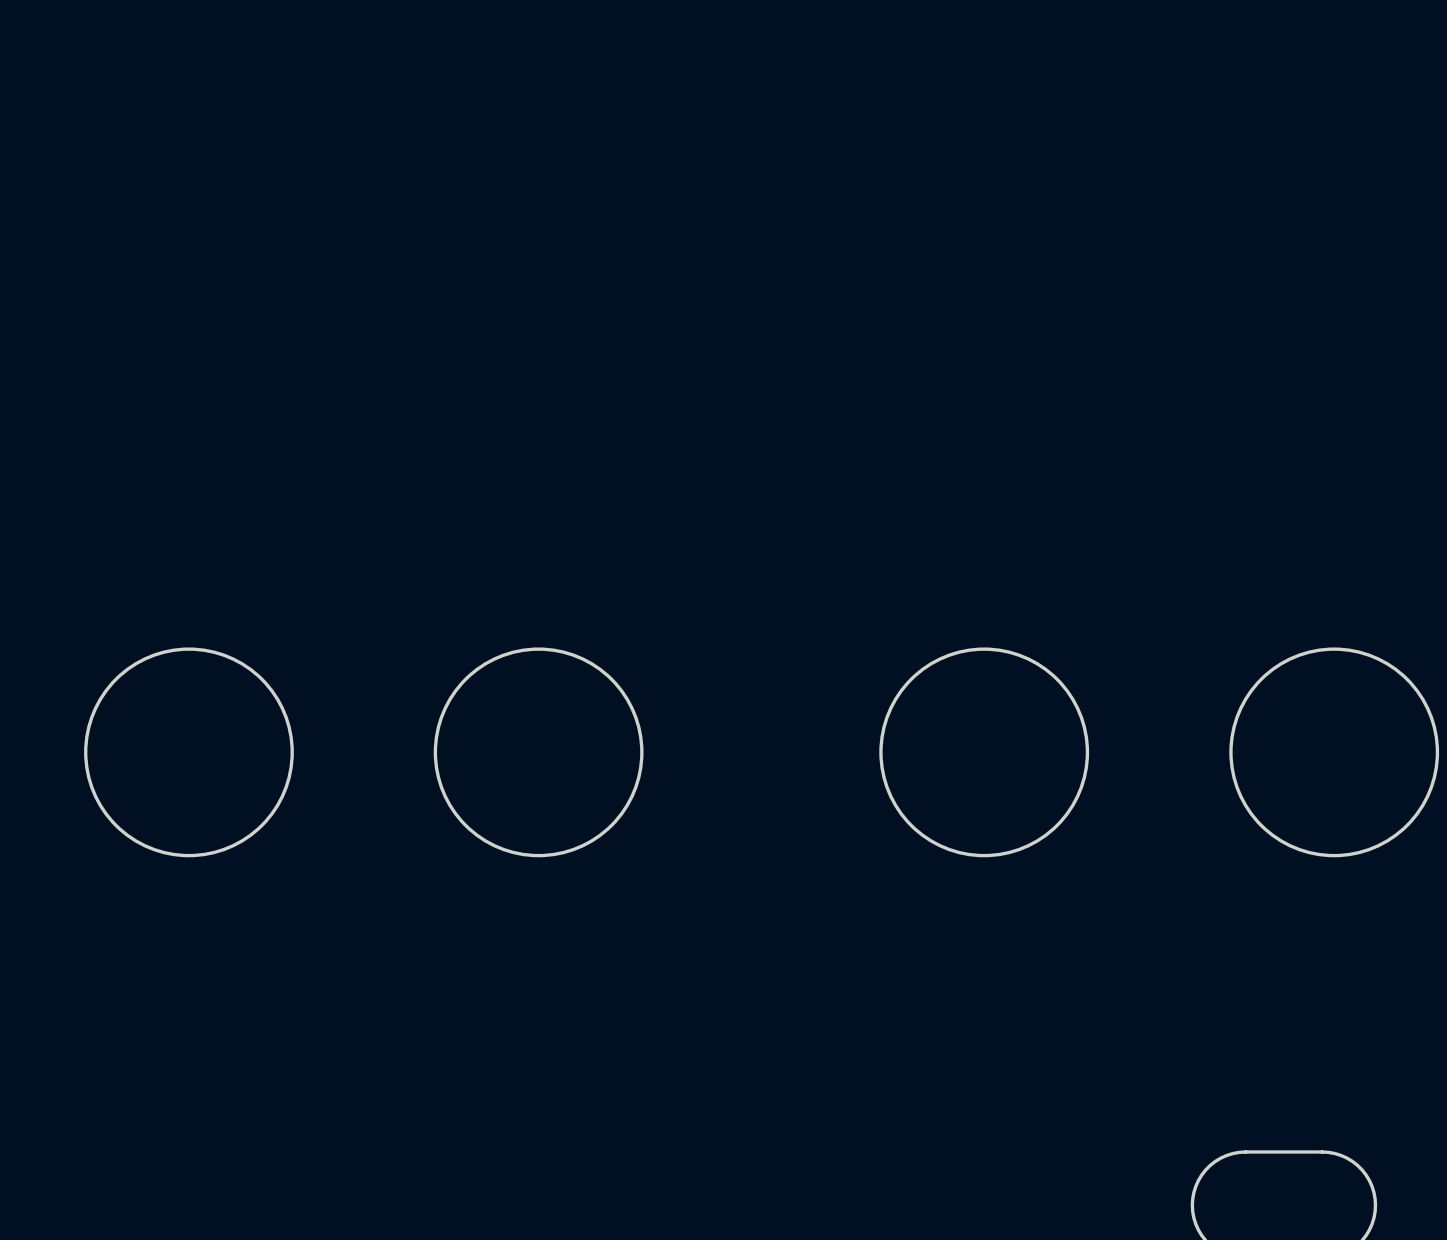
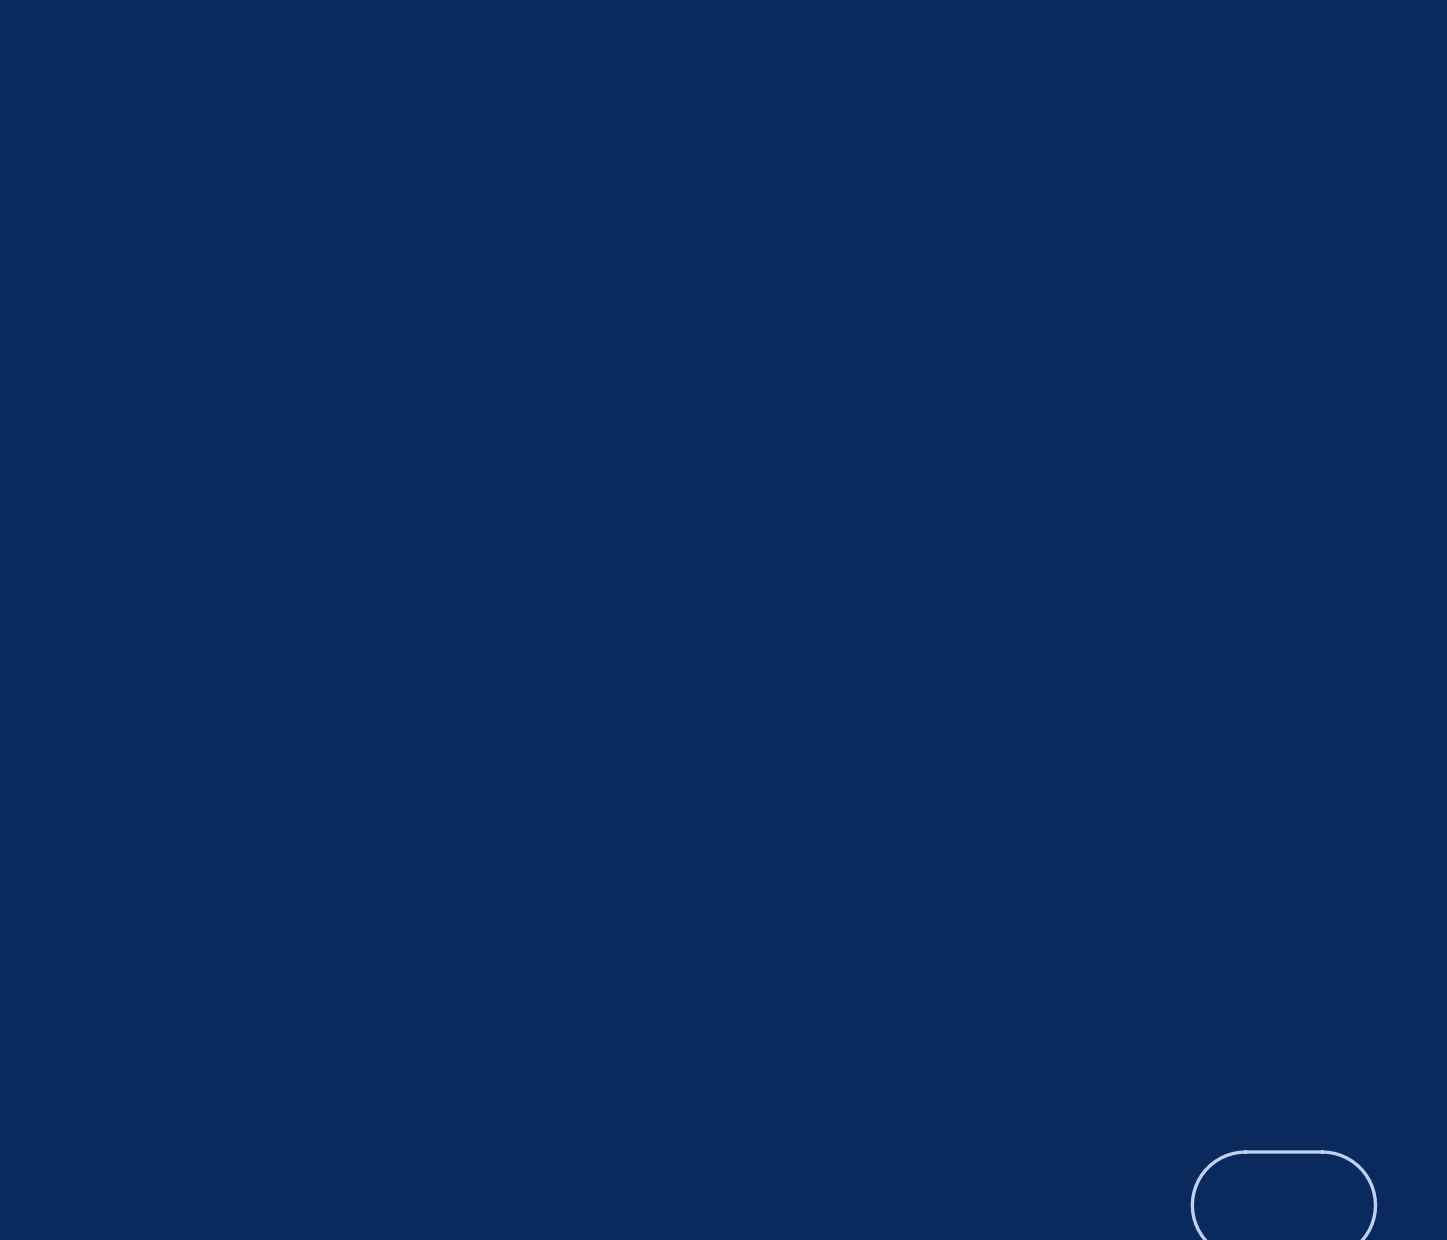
round board edge: [84, 647, 294, 858] -> none
round board edge: [433, 647, 644, 858] -> none
round board edge: [879, 647, 1090, 858] -> none
round board edge: [1229, 647, 1440, 858] -> none

